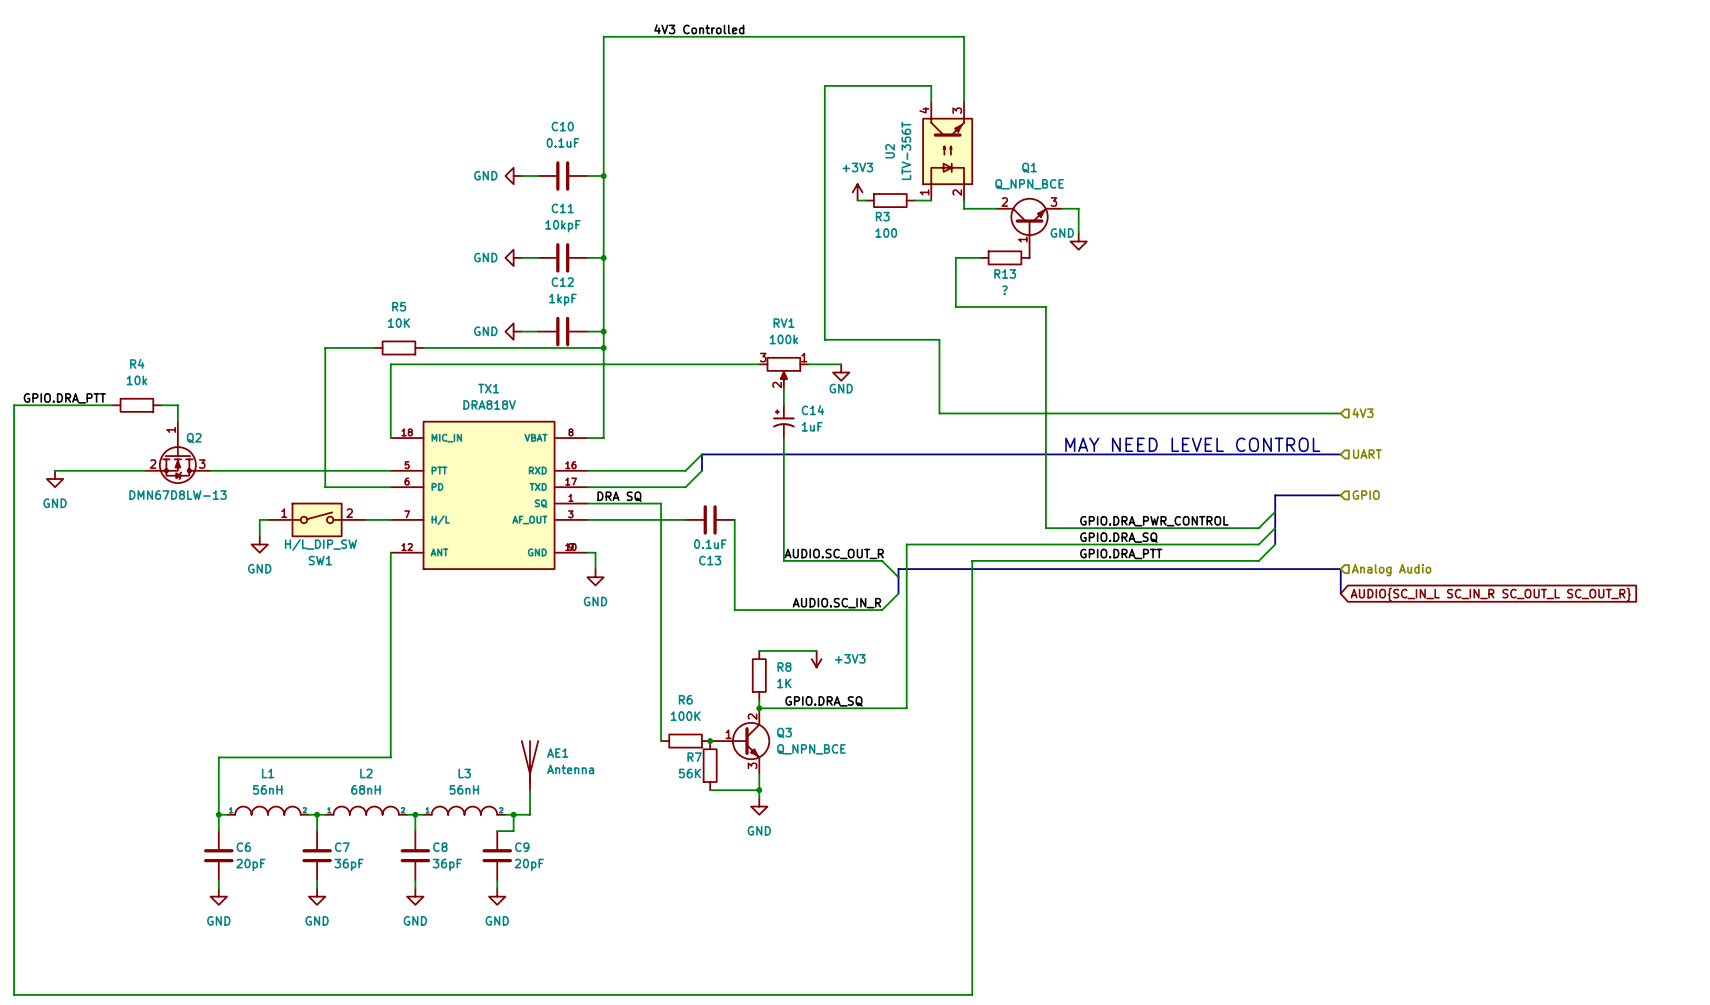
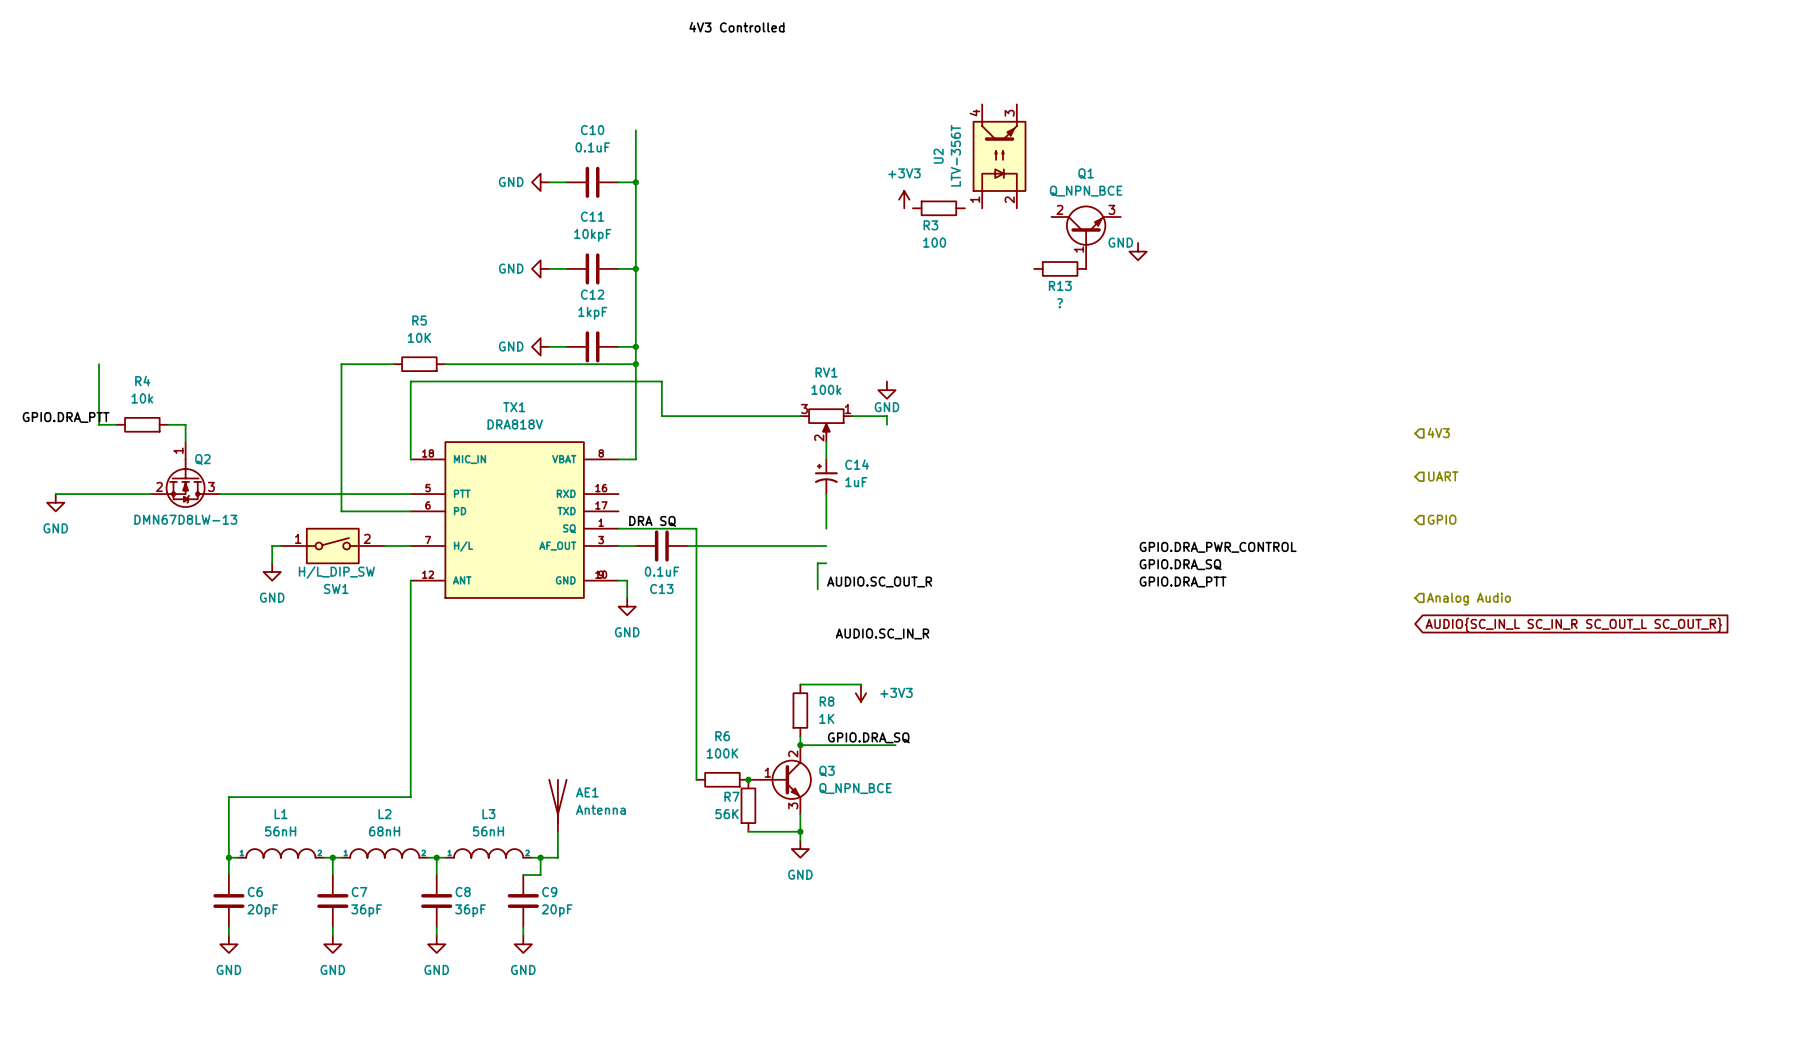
wire: (931, 102) (931, 85) (824, 85) (824, 339) (939, 339) (939, 413) (1340, 413) -> none
wire: (964, 102) (964, 36) (603, 36) (603, 126) -> none
wire: (857, 200) (865, 200) -> none
wire: (914, 200) (931, 200) -> none
wire: (964, 200) (964, 208) (996, 208) -> none
wire: (1062, 208) (1078, 208) (1078, 233) -> none
wire: (980, 257) (955, 257) (955, 307) (1045, 307) (1045, 528) (1258, 528) (1275, 511) -> none
wire: (628, 364) (759, 364) -> (661, 381) (661, 416) (800, 416)
wire: (808, 364) (841, 364) -> none
RV1 position: (783, 372) -> (826, 425)
wire: (783, 388) (783, 405) -> none
wire: none -> (852, 416) (886, 416) (886, 424)
wire: (95, 405) (14, 405) (14, 994) (972, 994) (972, 560) (1258, 560) (1275, 544) -> (99, 424) (99, 364)
C14 position: (783, 421) -> (826, 476)
text: MAY NEED LEVEL CONTROL (1192, 444) -> none
wire: (701, 454) (685, 470) (587, 470) -> none
bus: (1340, 454) (701, 454) (701, 470) -> none
wire: (701, 470) (685, 487) (587, 487) -> none
bus: (1340, 495) (1275, 495) (1275, 544) -> none
wire: (783, 503) (783, 560) (882, 560) (898, 577) -> none
wire: none -> (722, 546) (826, 546)
C13 position: (710, 519) -> (661, 546)
wire: (734, 519) (734, 610) (882, 610) (898, 593) -> none
wire: (1275, 528) (1258, 544) (906, 544) (906, 708) (849, 708) -> none
wire: none -> (826, 563) (817, 563) (817, 589)
bus: (898, 593) (898, 569) (1340, 569) (1340, 593) -> none

